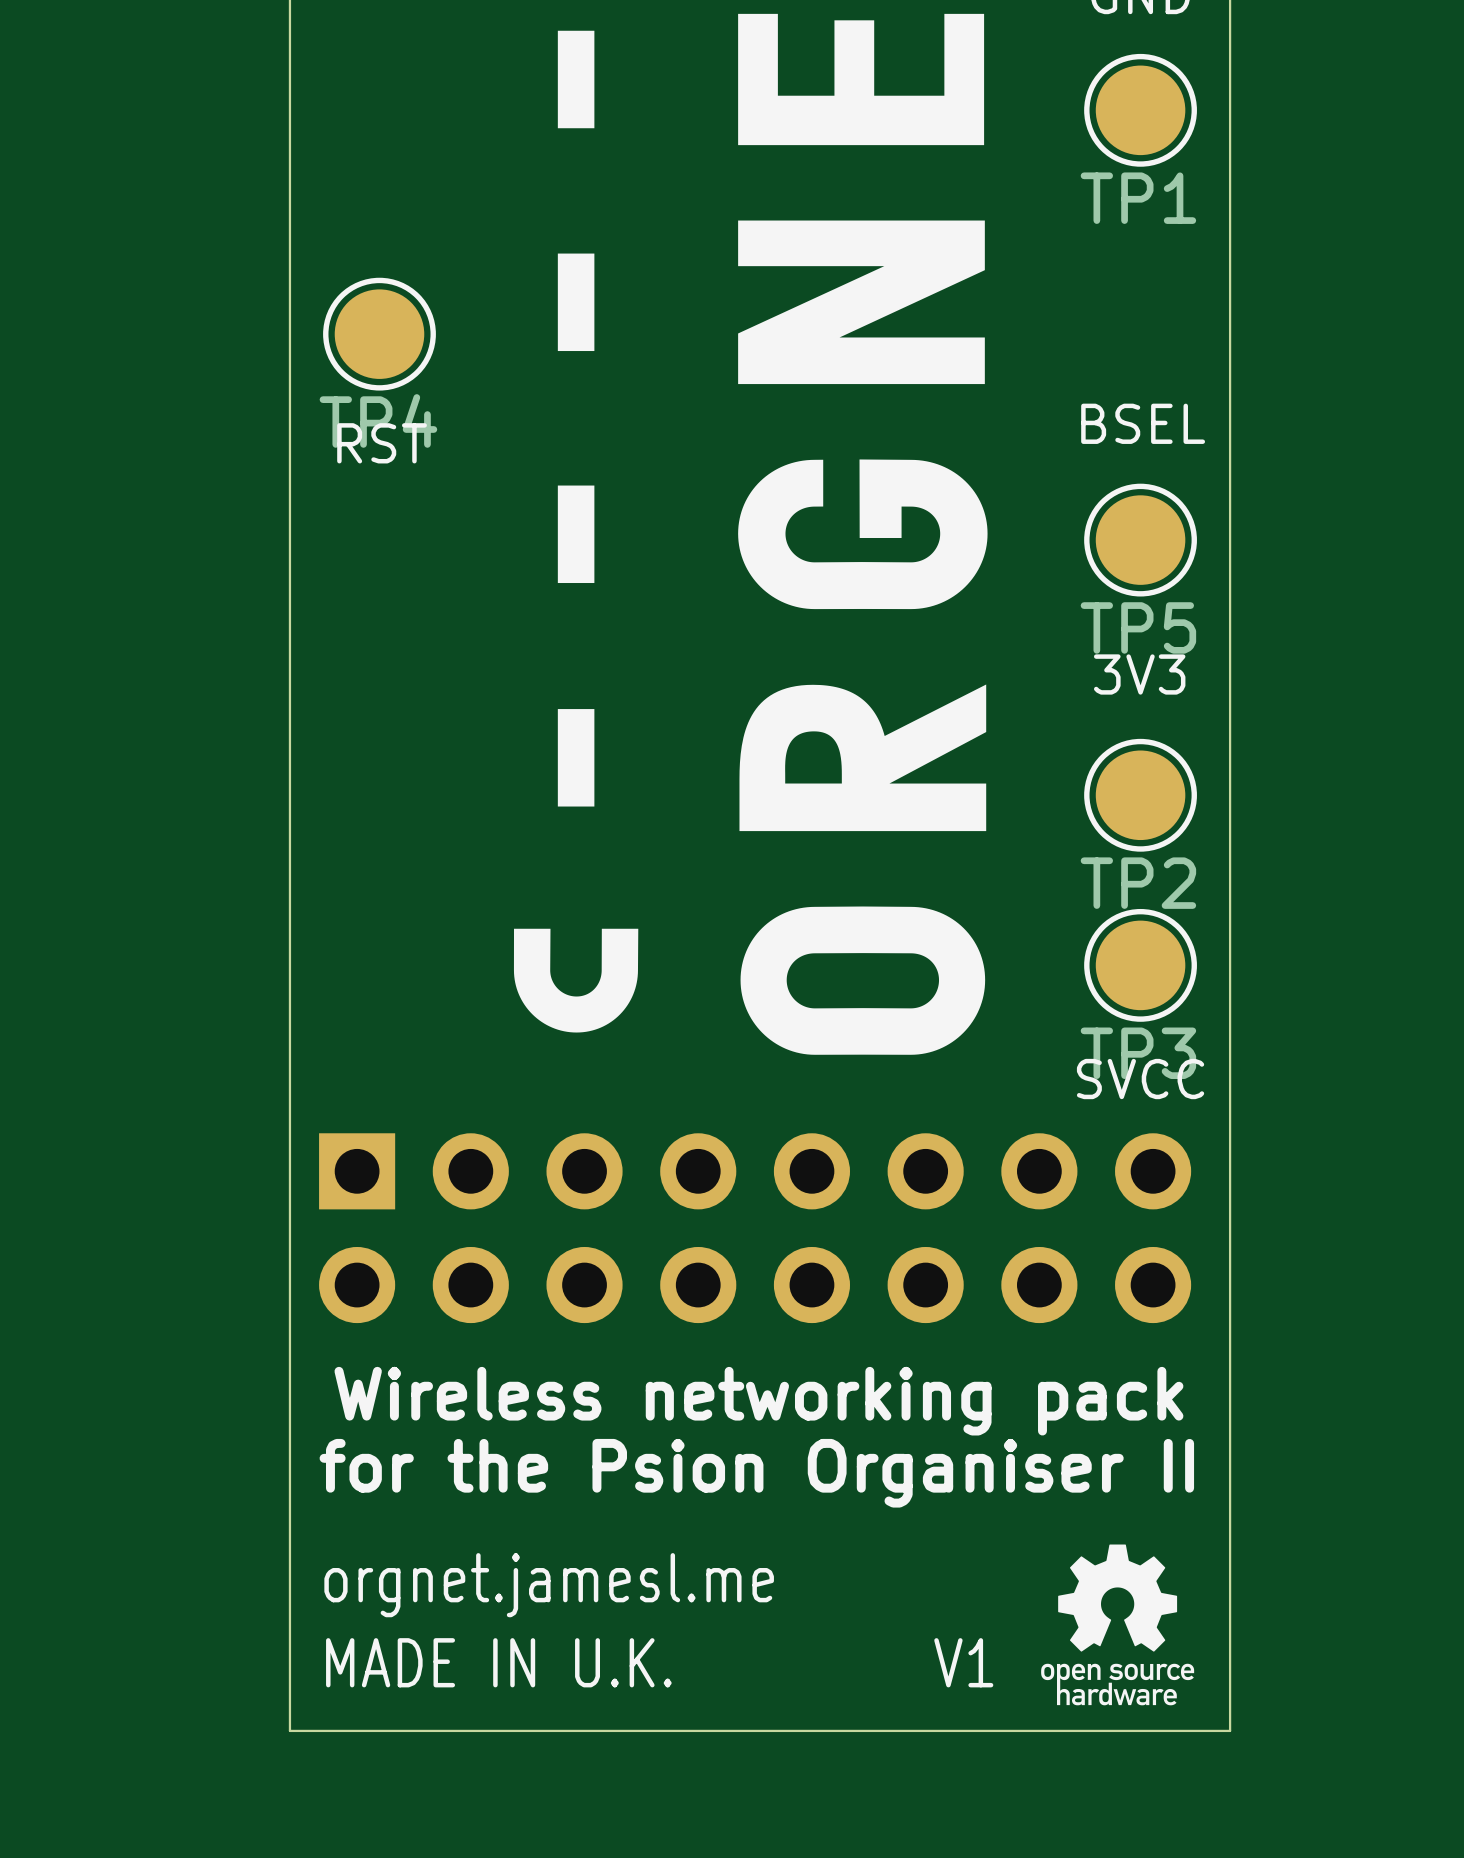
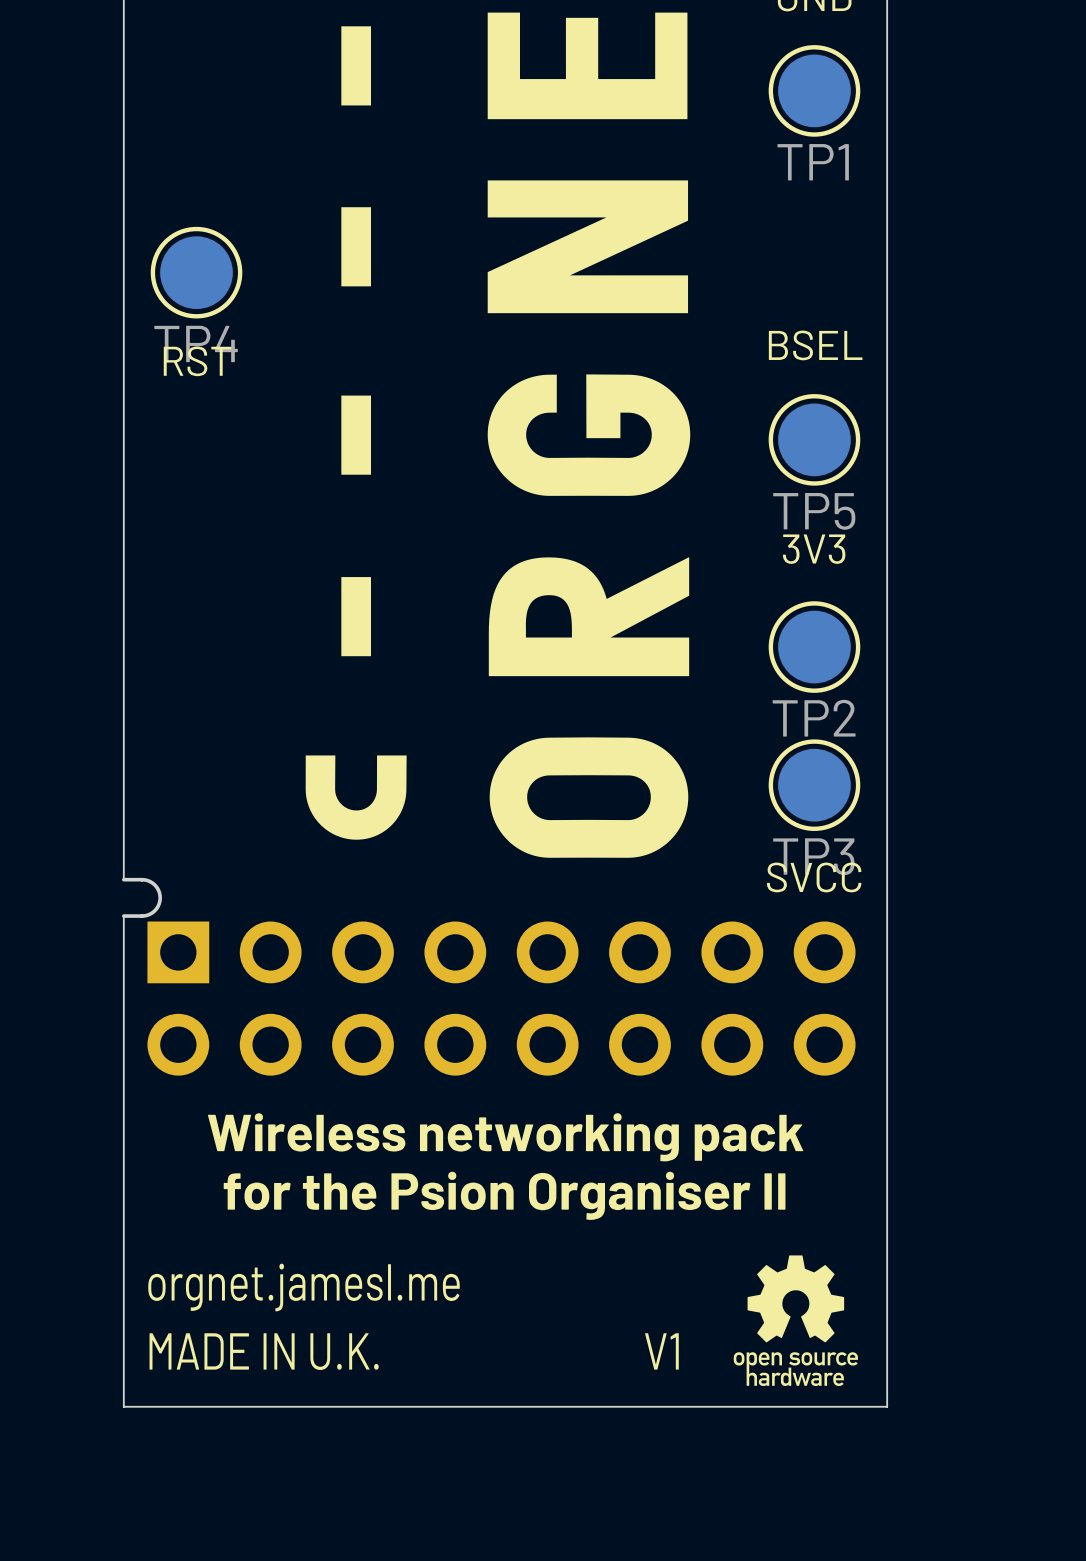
board edge: (289, 1081) (289, 1126) -> (123, 879) (150, 881) (156, 887) (160, 897) (156, 908) (150, 913) (123, 916)

